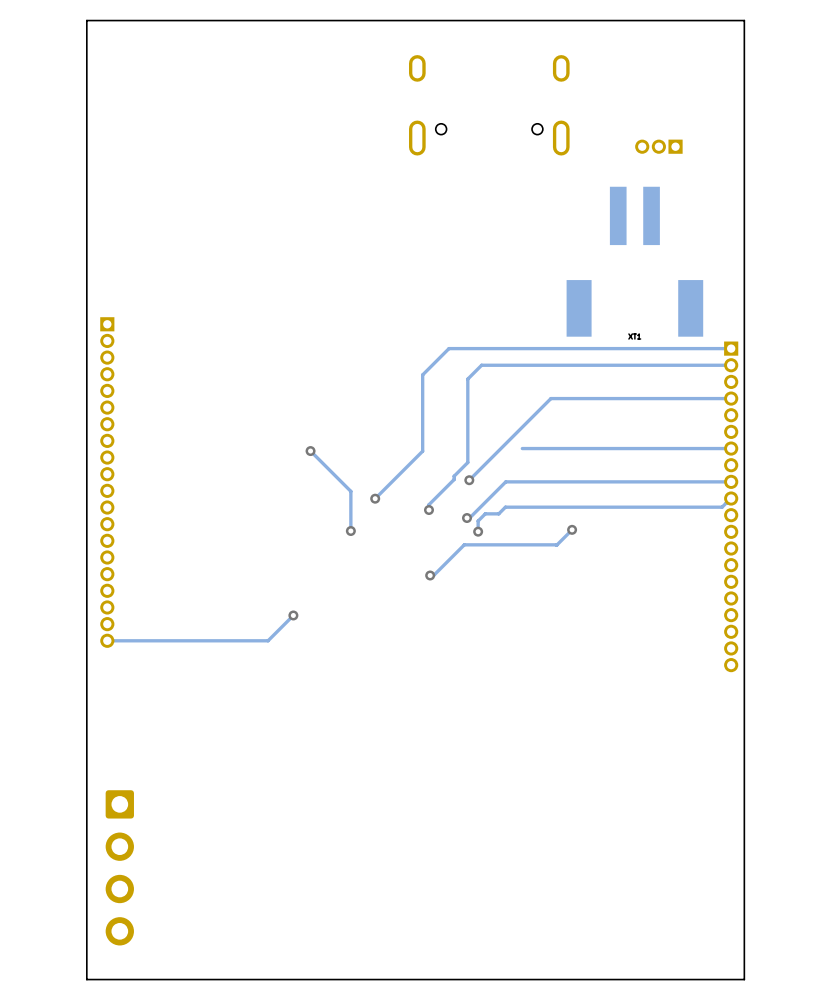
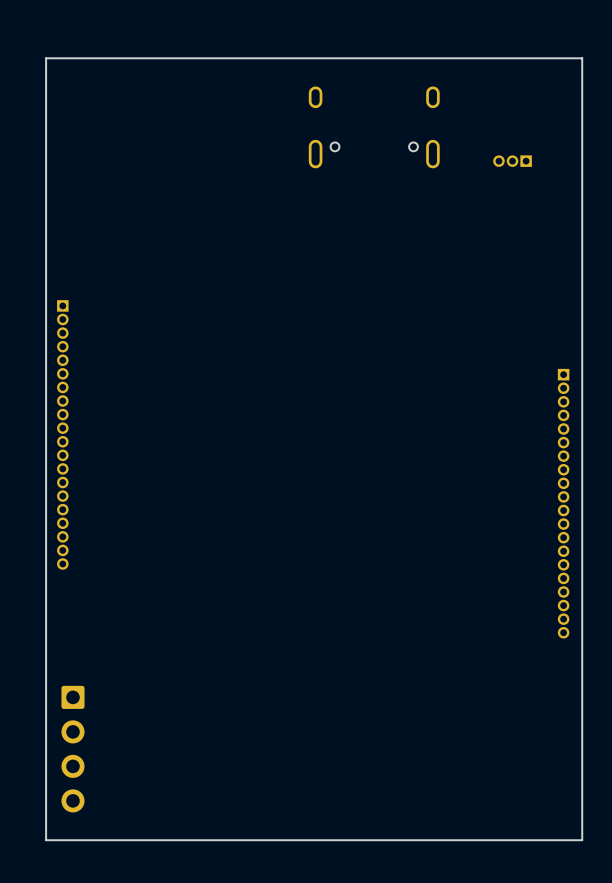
part: (634, 261) -> none
track: (731, 348) (448, 348) (422, 374) (422, 451) (375, 498) -> none
track: (731, 365) (481, 365) (467, 379) (467, 462) (428, 504) (428, 510) -> none
track: (731, 398) (550, 398) (469, 480) -> none
track: (731, 448) (522, 448) -> none
track: (310, 451) (350, 491) (350, 531) -> none
via: (310, 451) -> none
via: (469, 480) -> none
track: (731, 481) (505, 481) (469, 518) (467, 518) -> none
via: (375, 498) -> none
track: (731, 498) (722, 507) (505, 507) (498, 513) (485, 513) (478, 521) (478, 531) -> none
part position: (731, 506) -> (563, 503)
via: (428, 510) -> none
via: (467, 518) -> none
track: (572, 529) (556, 545) -> none
via: (572, 529) -> none
via: (350, 531) -> none
via: (478, 531) -> none
track: (556, 544) (464, 544) (433, 575) (430, 575) -> none
via: (430, 575) -> none
track: (293, 615) (268, 640) (107, 640) -> none
via: (293, 615) -> none

